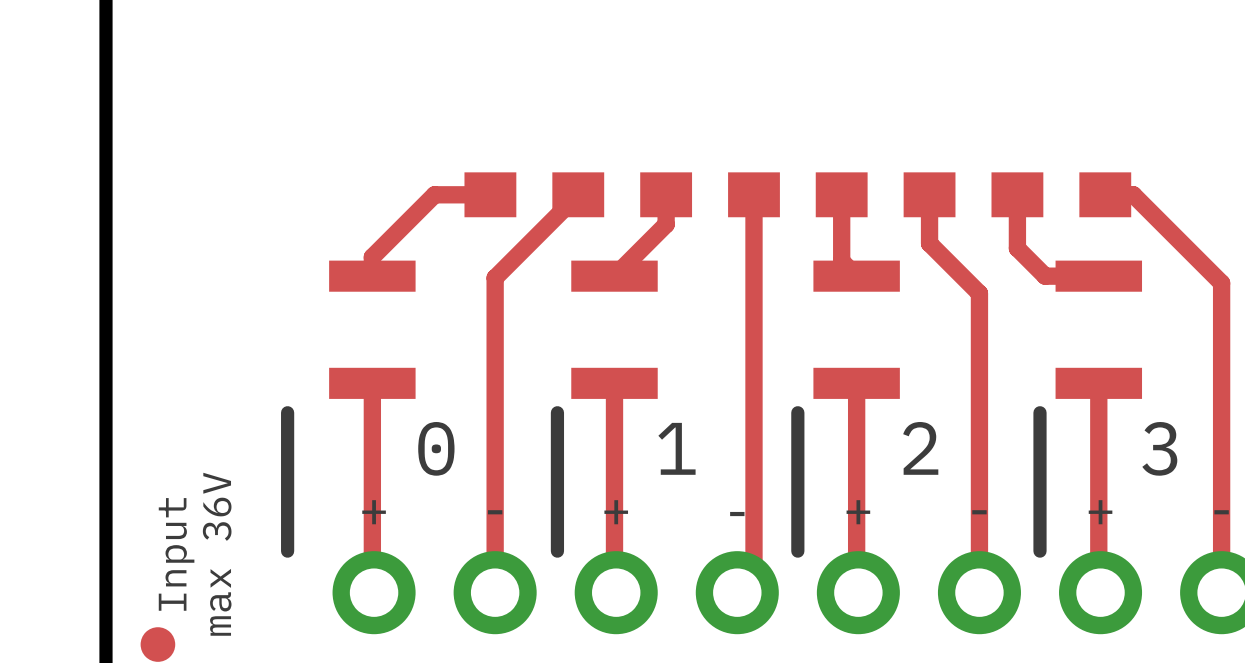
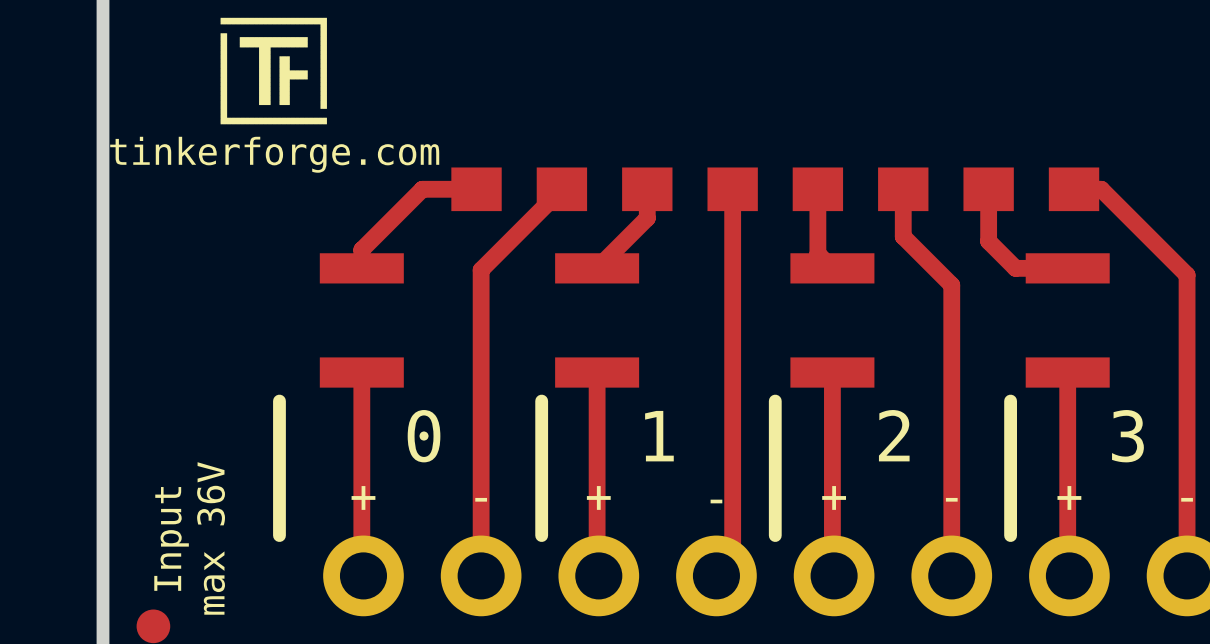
drawing: none -> [220, 17, 327, 125]
text: none -> tinkerforge.com (274, 154)

